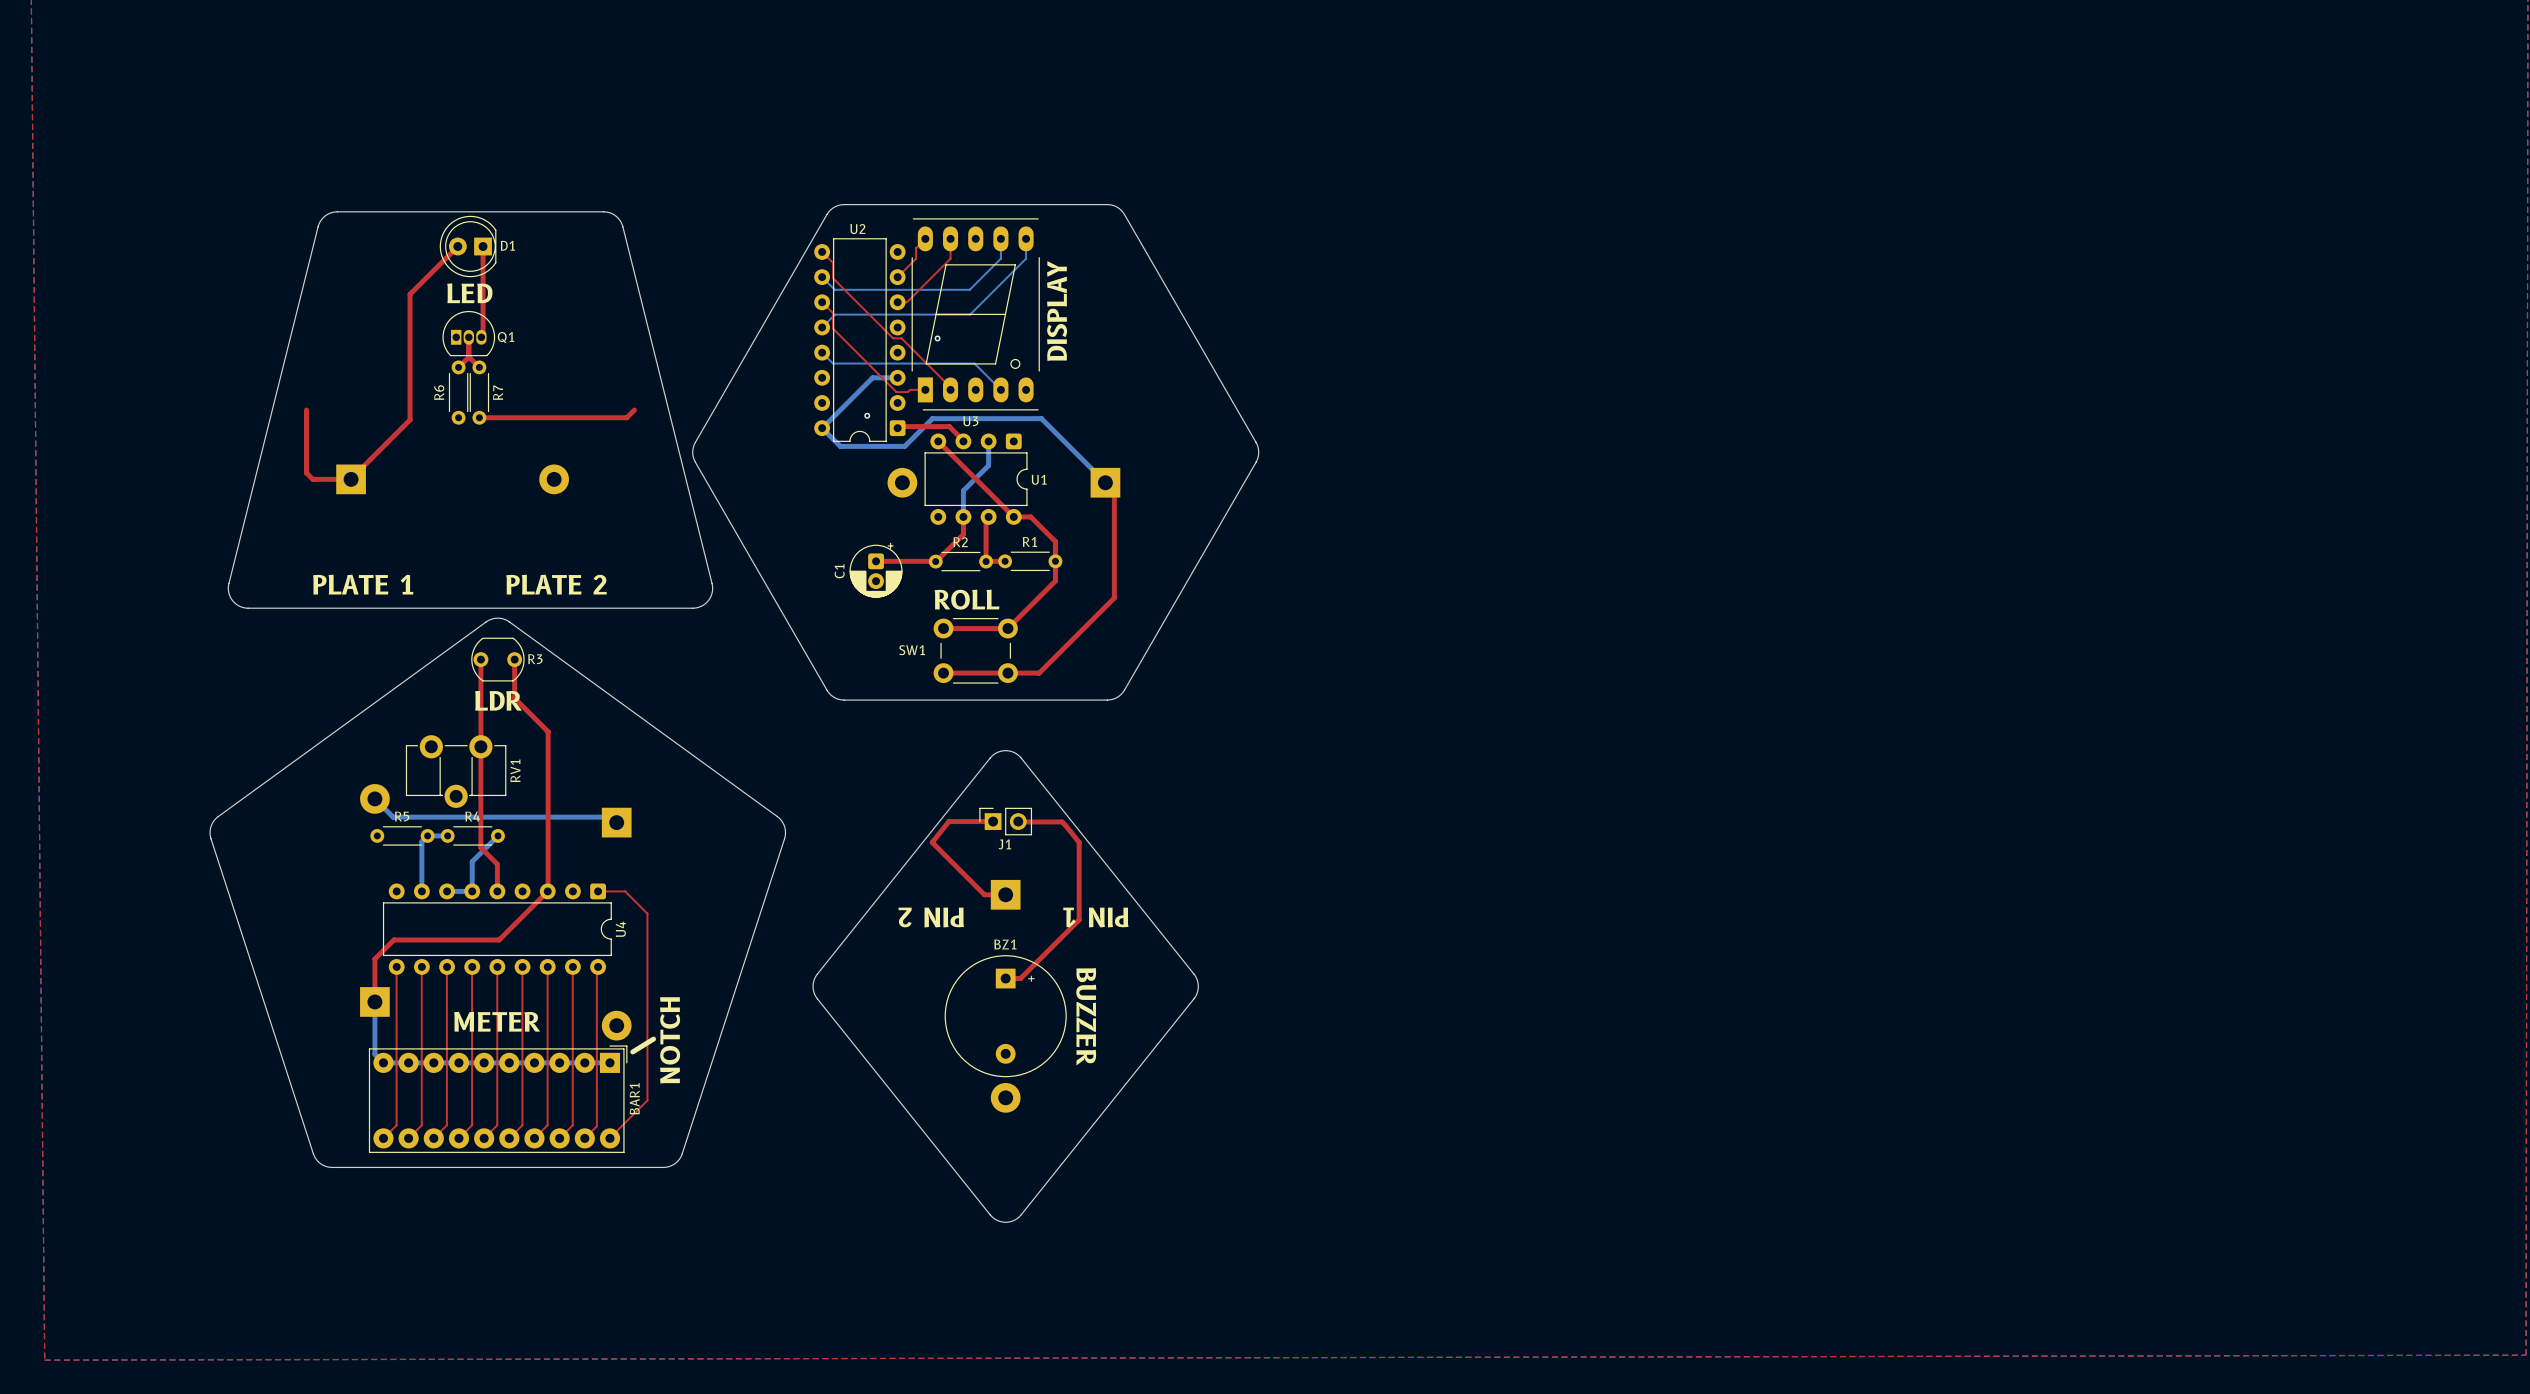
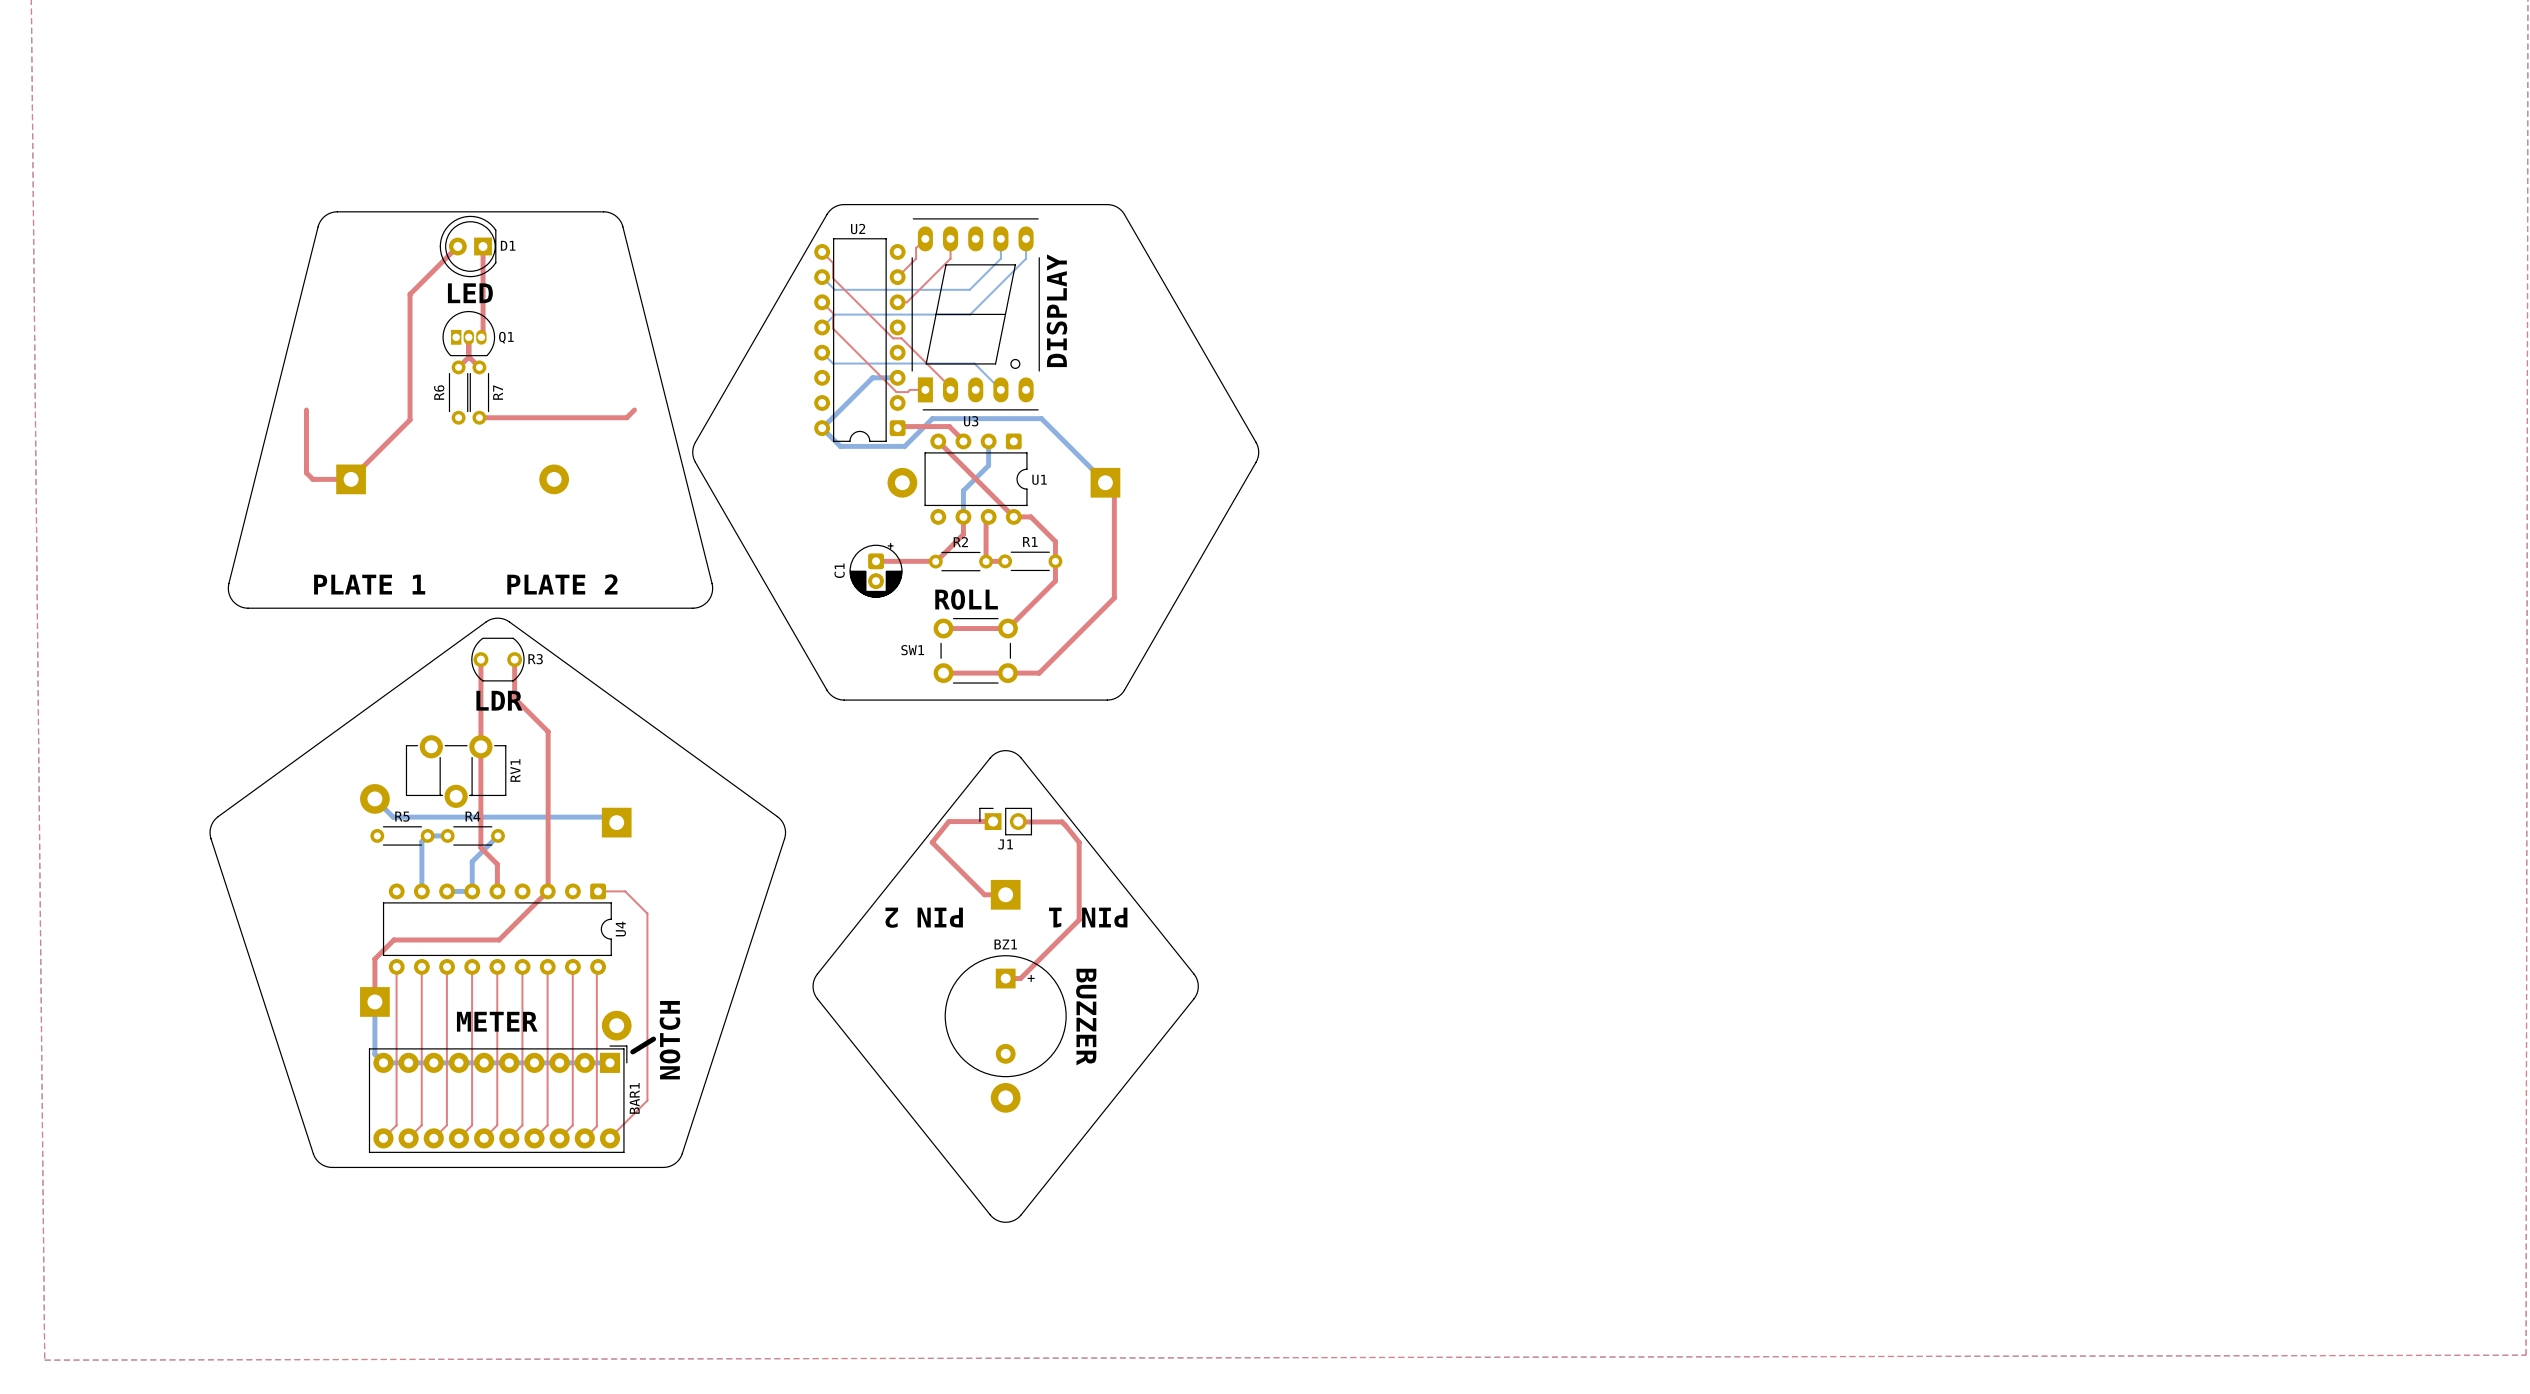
via: (937, 338) -> none
via: (867, 415) -> none

